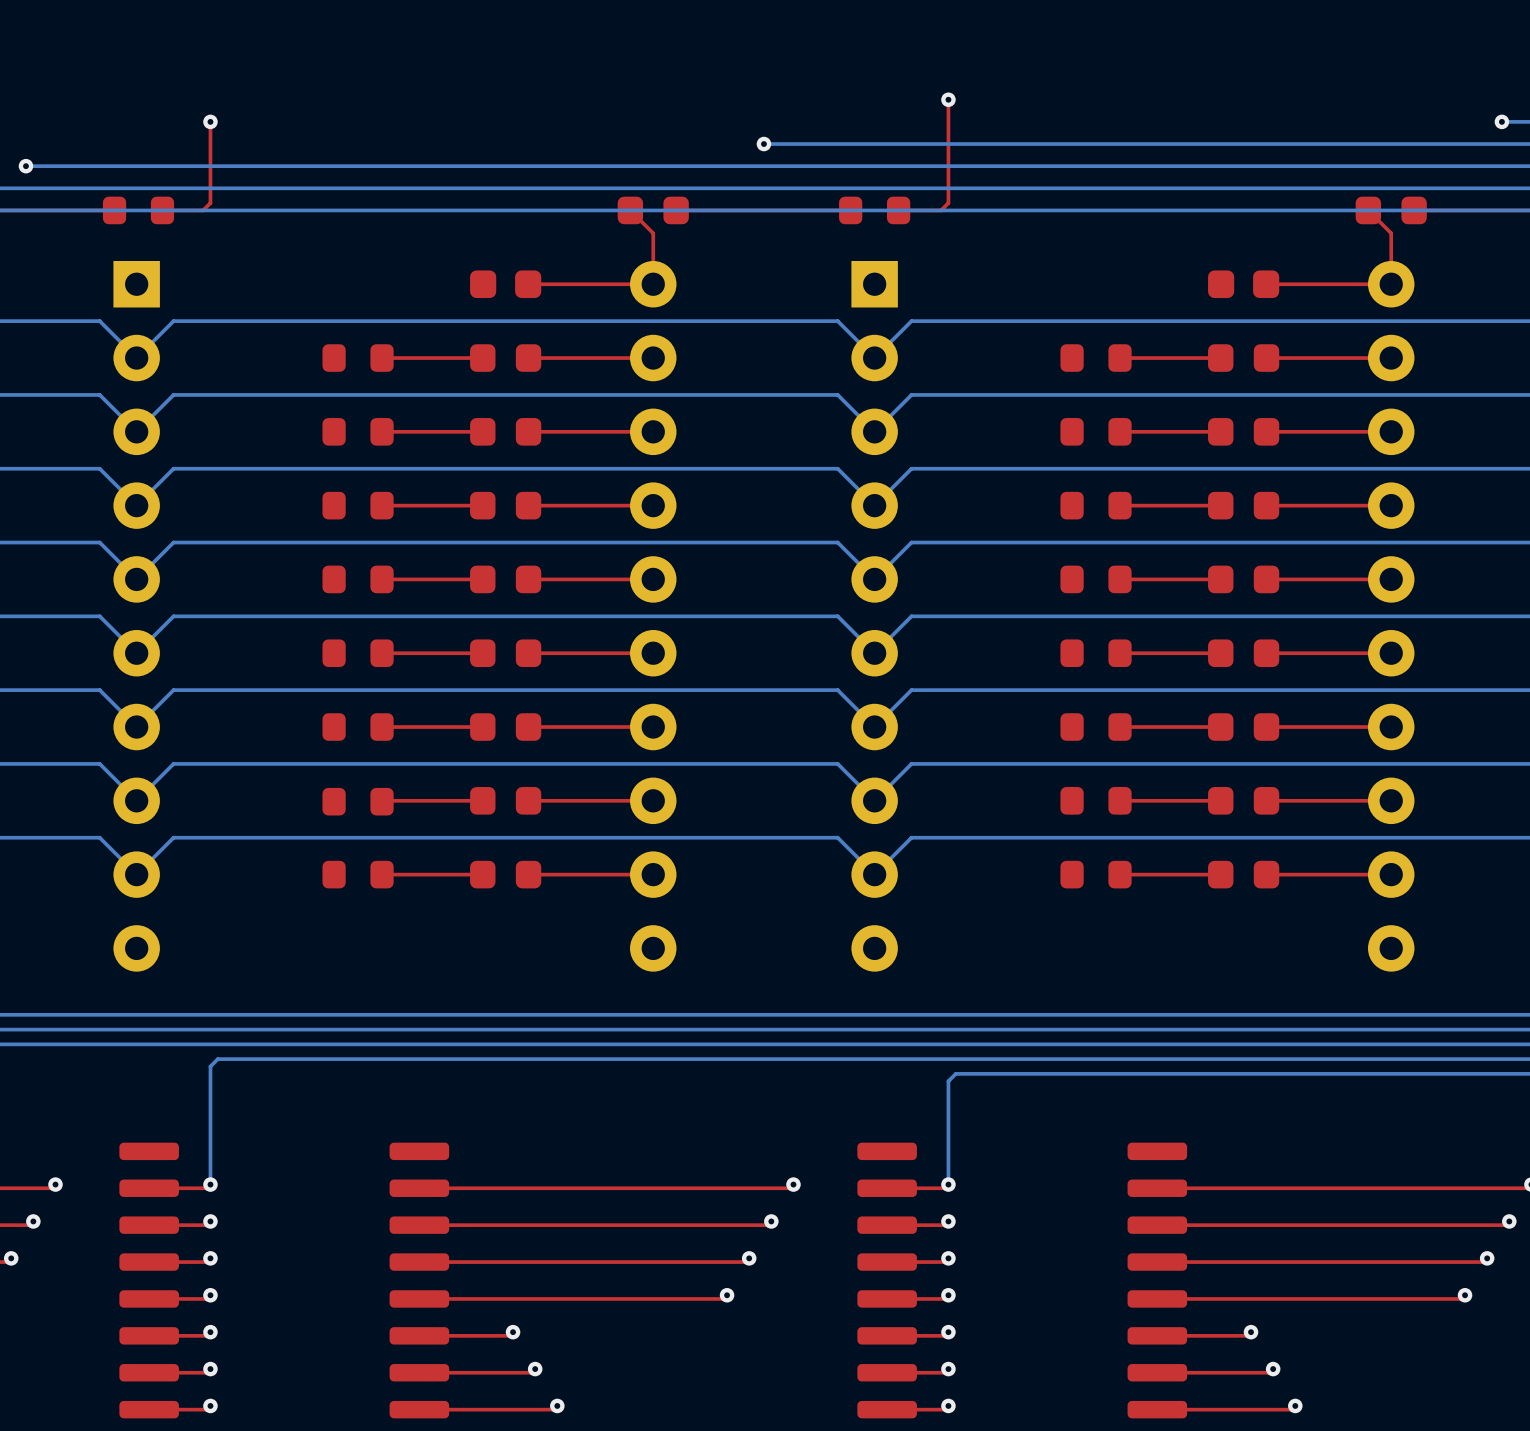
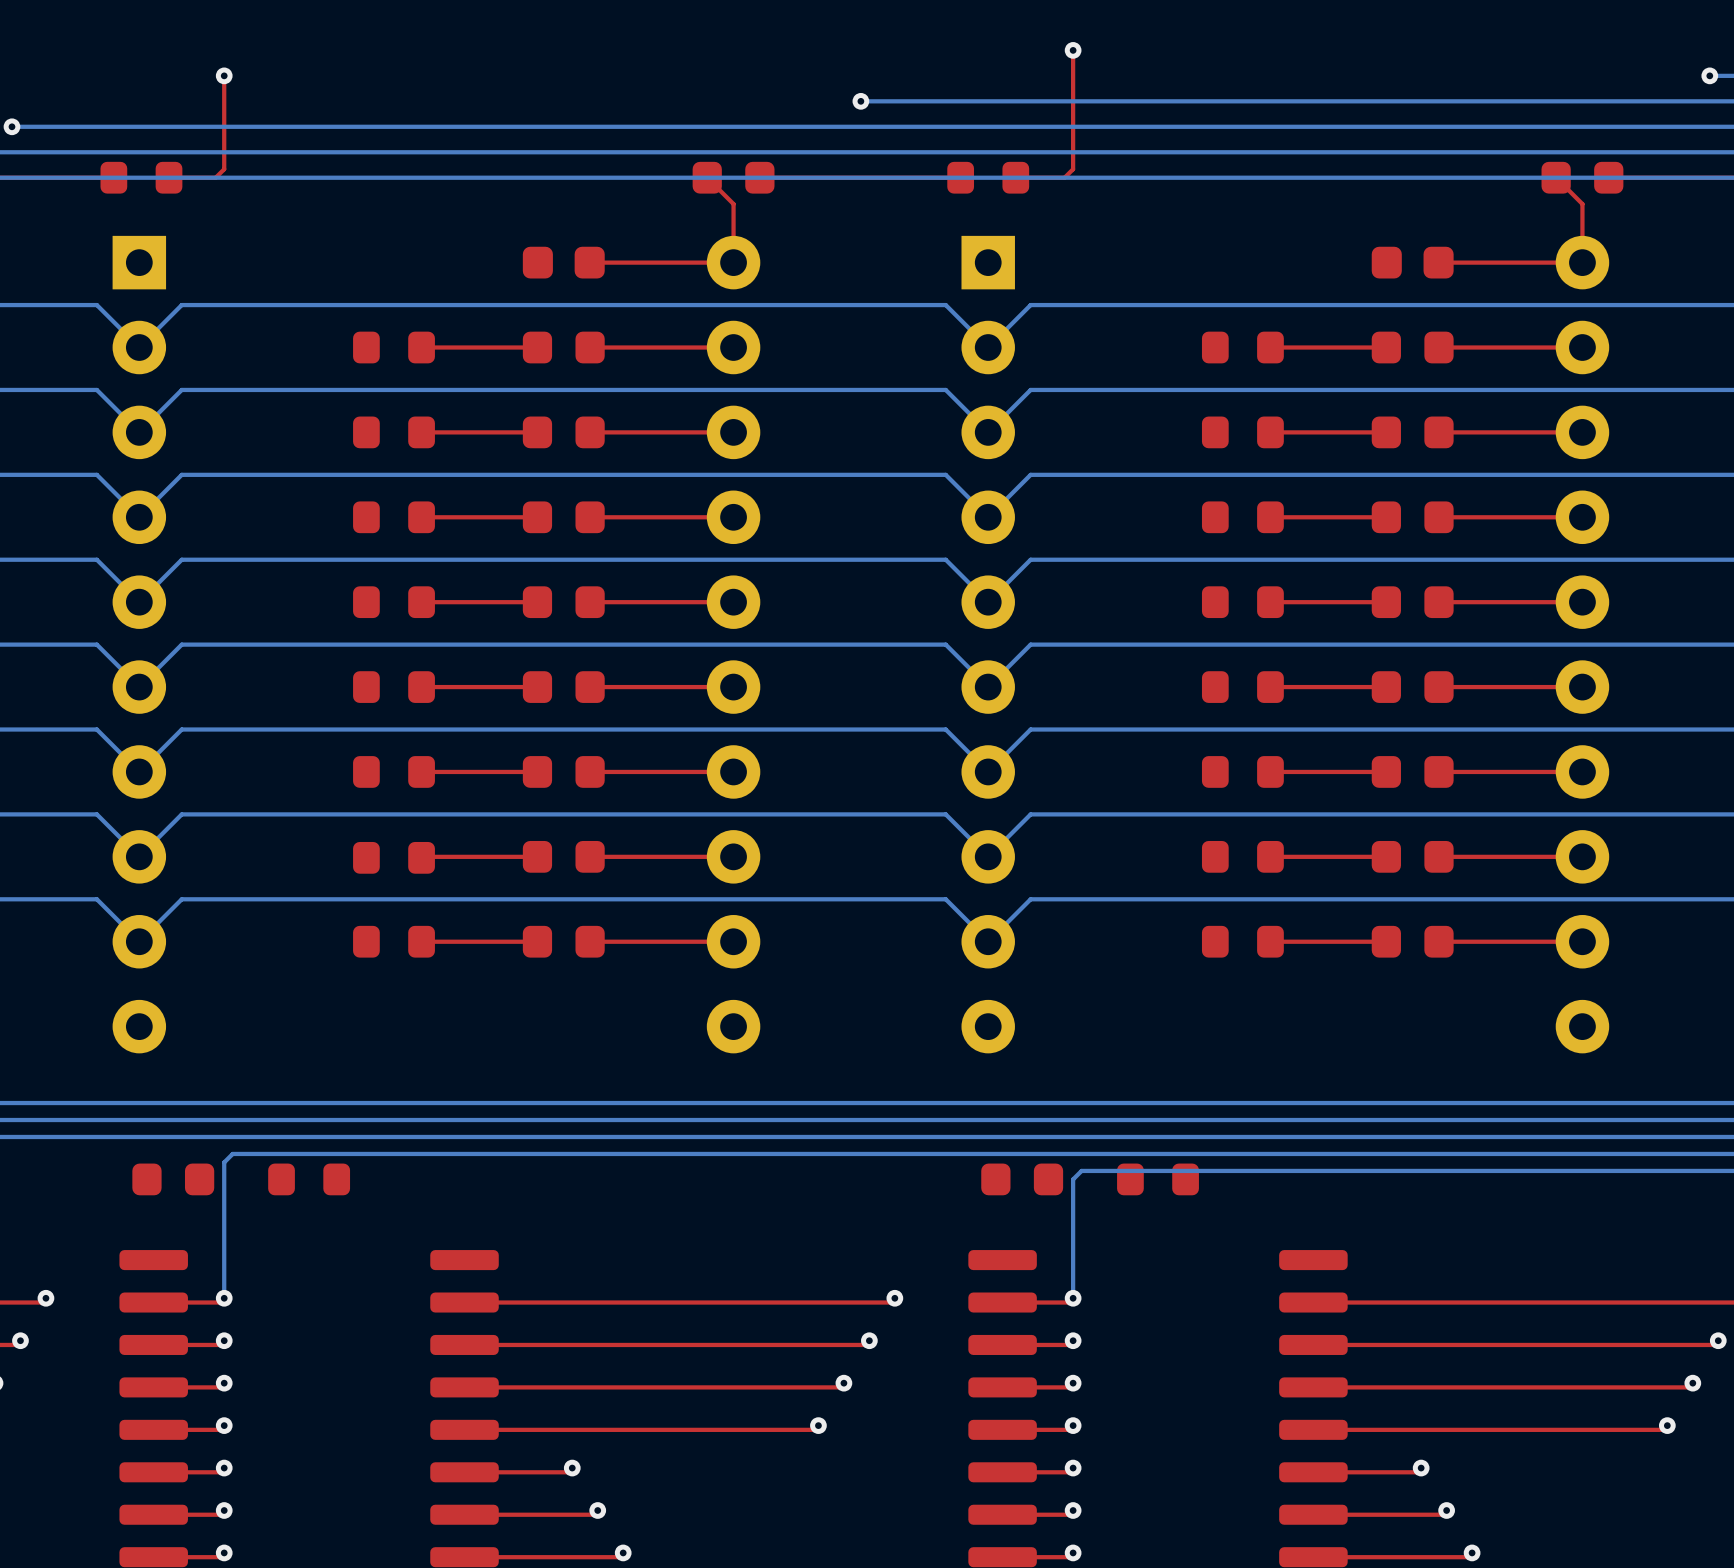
part: none -> (173, 1179)
part: none -> (309, 1179)
part: none -> (1022, 1179)
part: none -> (1158, 1179)

